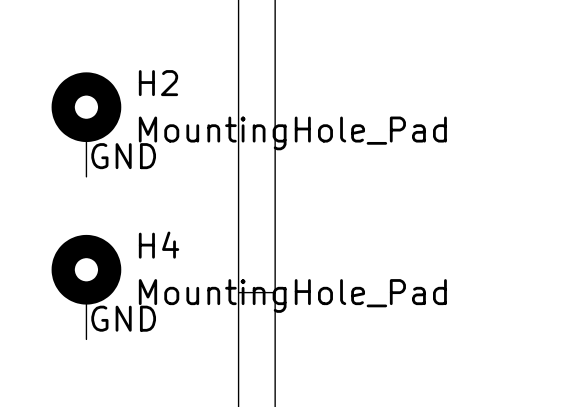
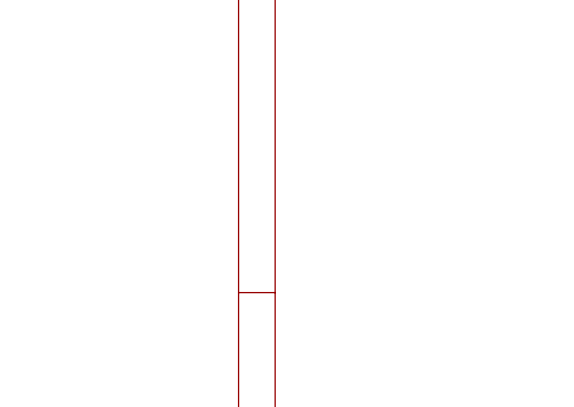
H2: MountingHole_Pad (86, 124) -> none
label: GND (123, 156) -> none
H4: MountingHole_Pad (86, 287) -> none
label: GND (123, 318) -> none

